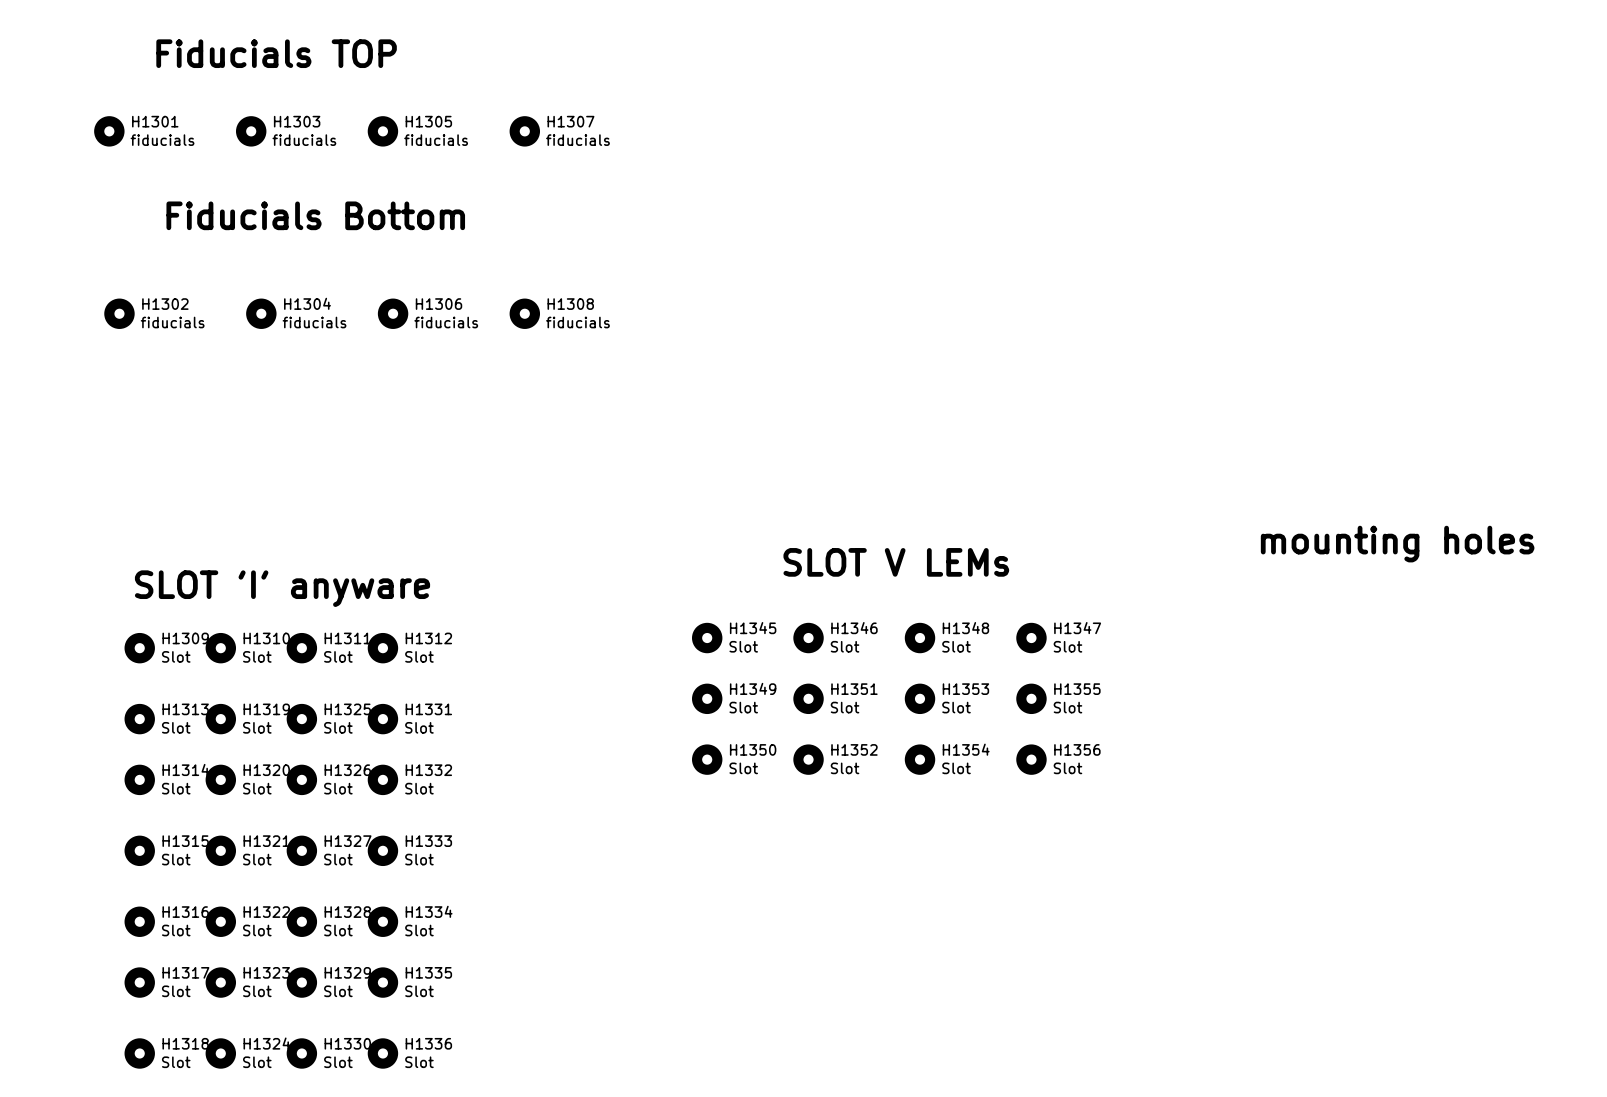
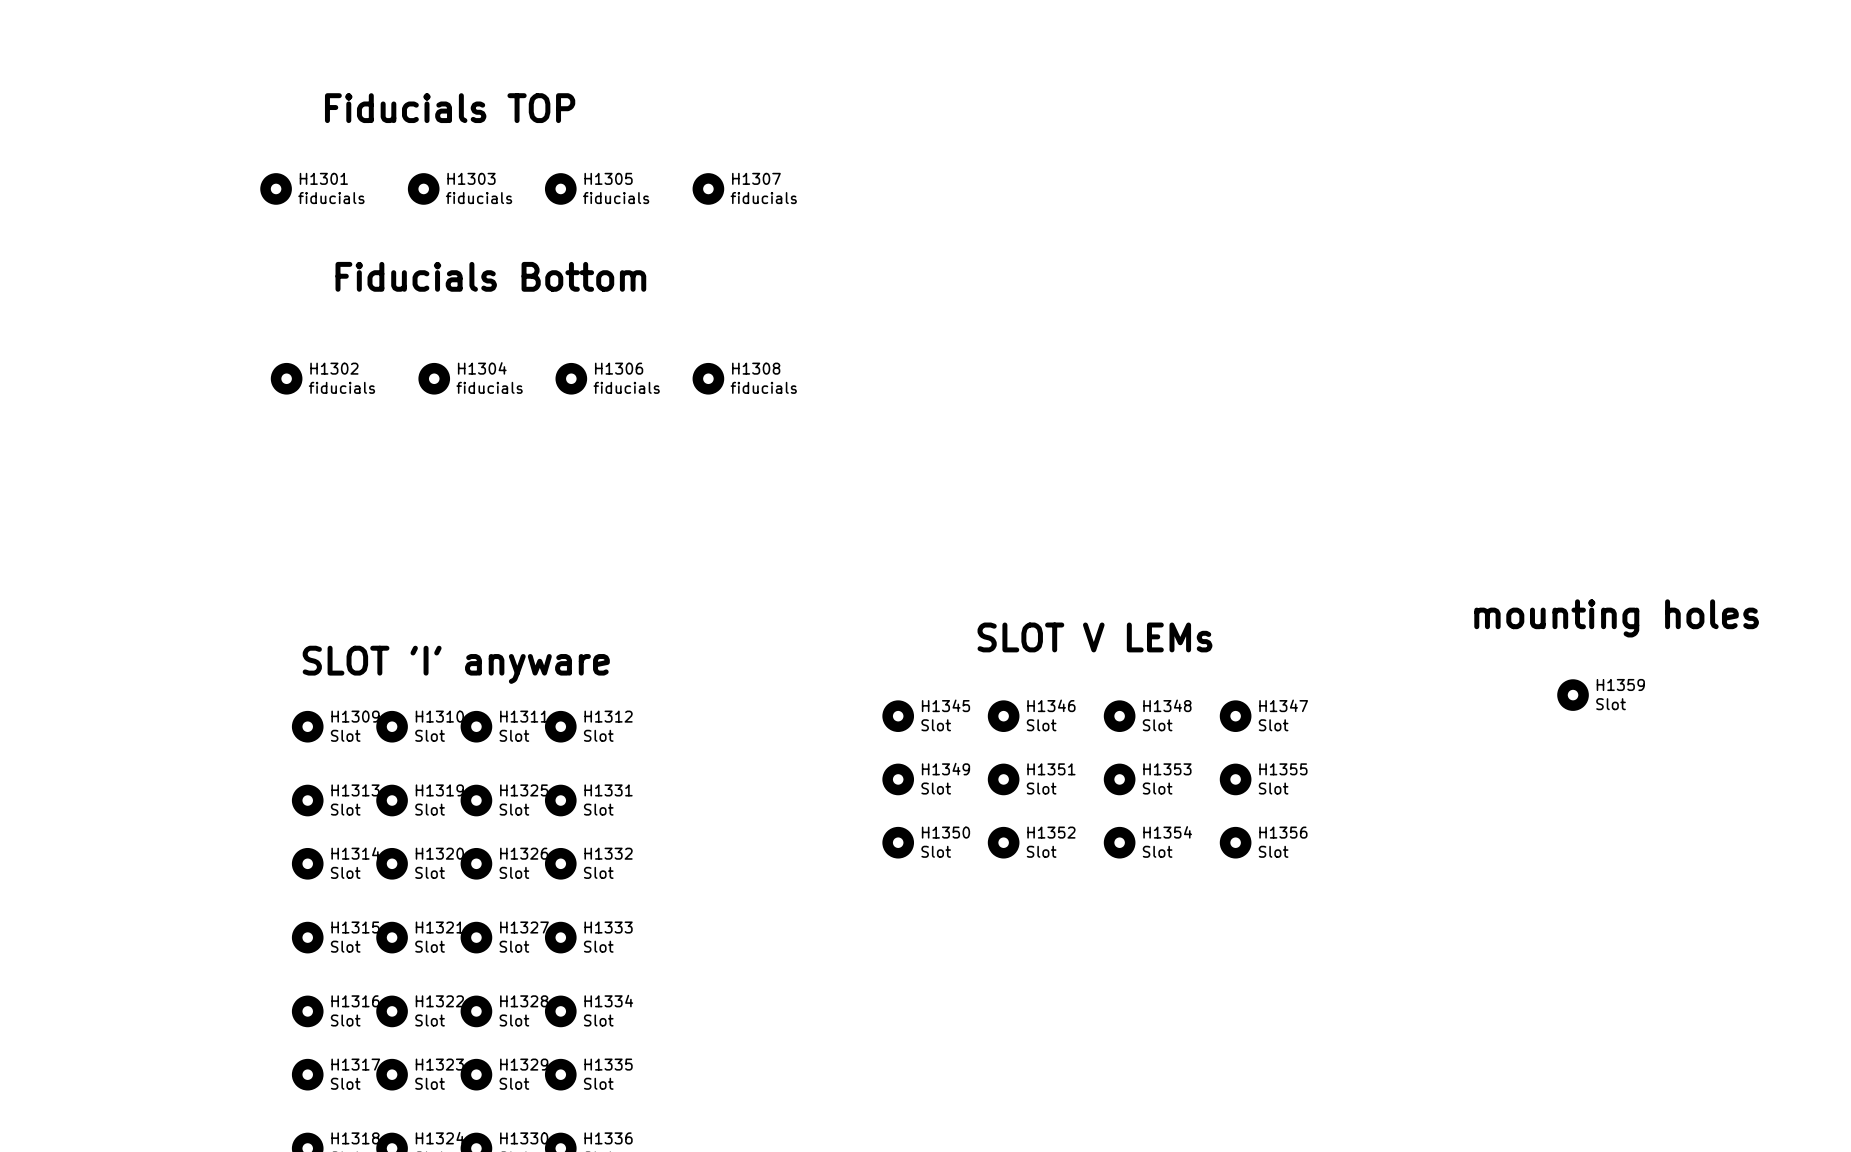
H1359: none -> Slot (1573, 695)

